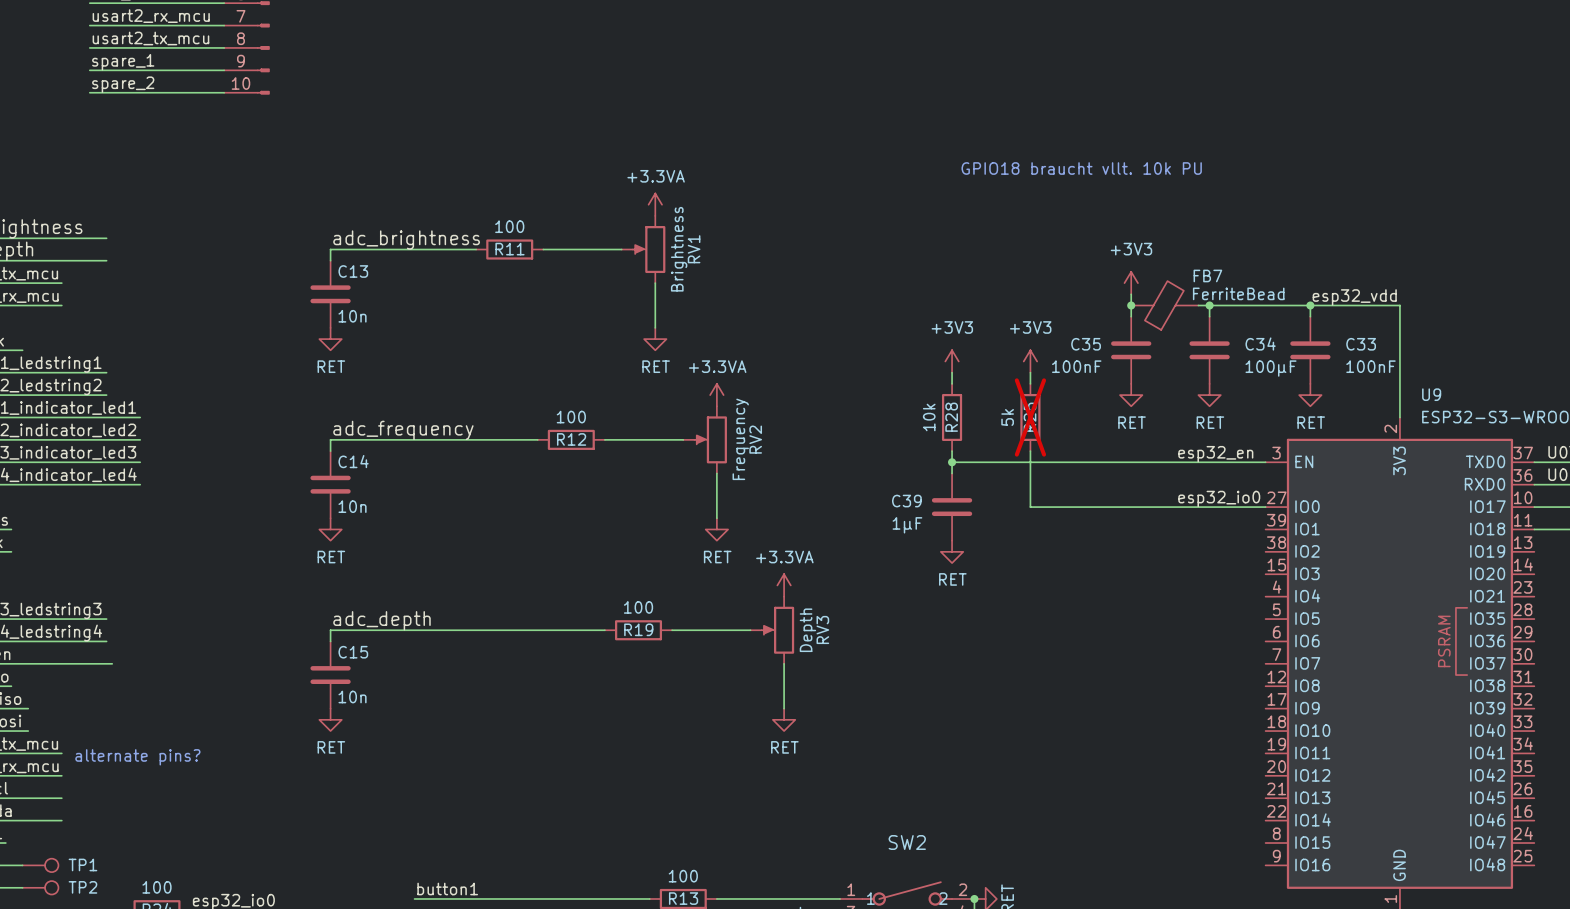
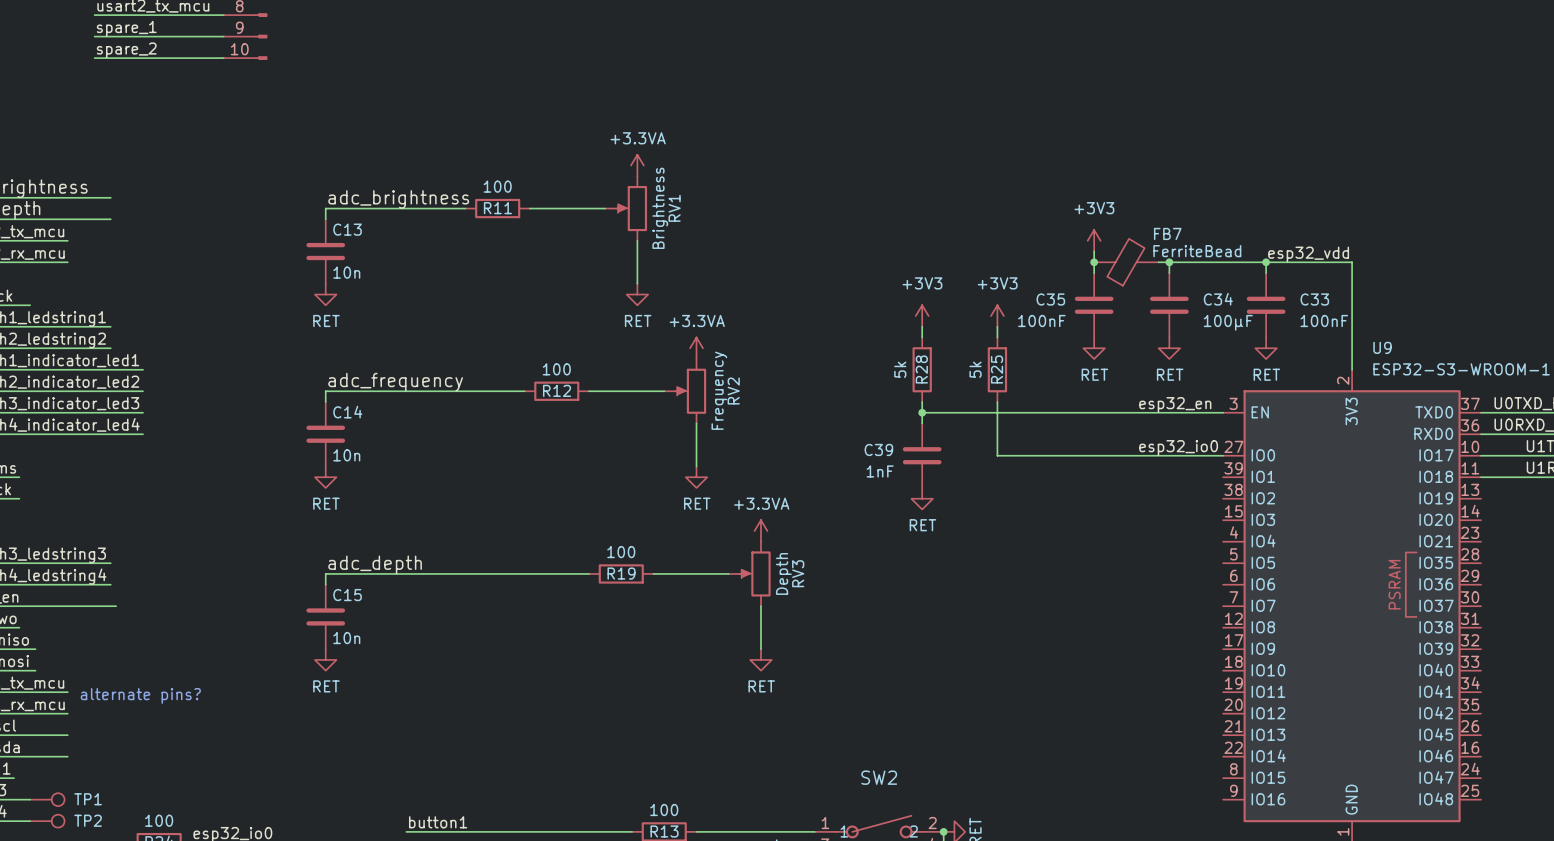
text: GPIO18 braucht vllt. 10k PU (1081, 168) -> none
R28 value: 10k (929, 417) -> 5k (900, 369)
R25 do-not-place cross: (1030, 417) -> none
C39 value: 1µF (907, 525) -> 1nF (880, 471)

